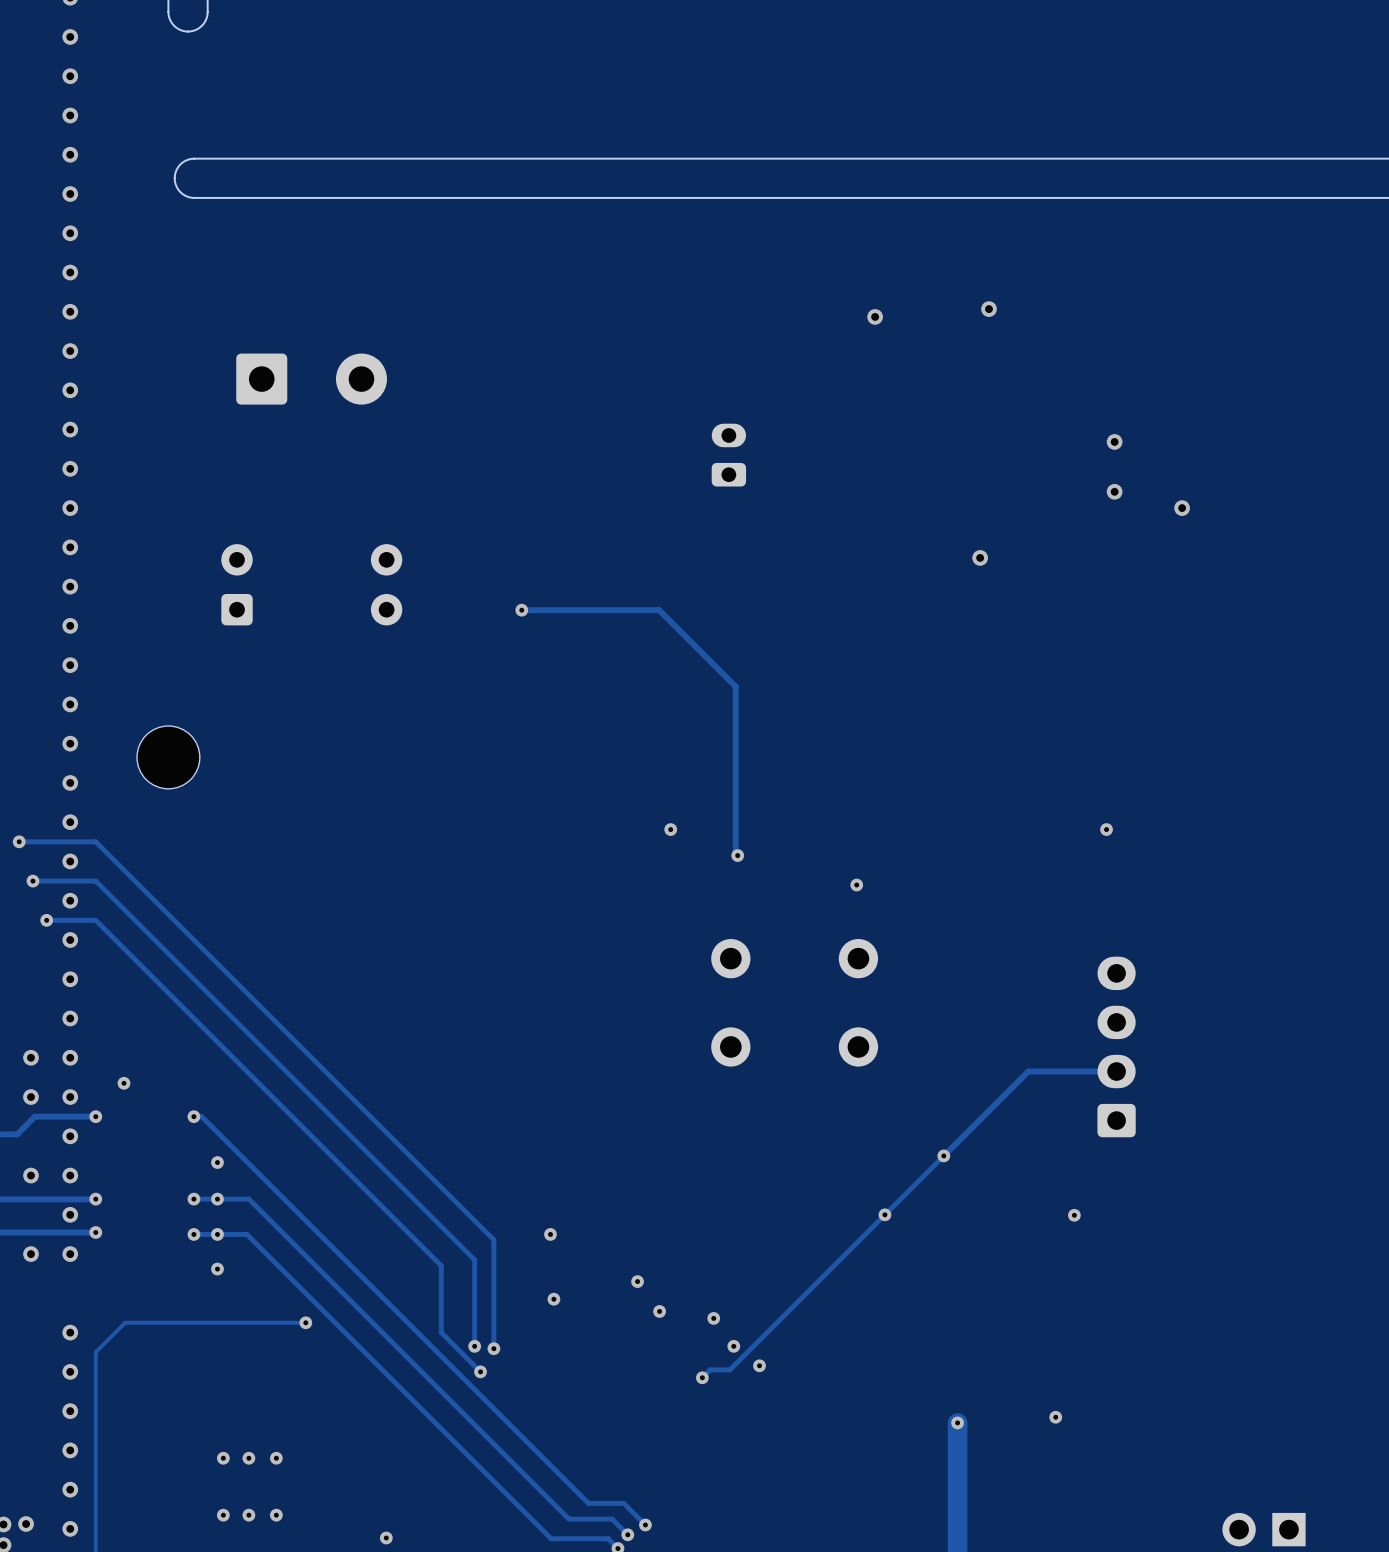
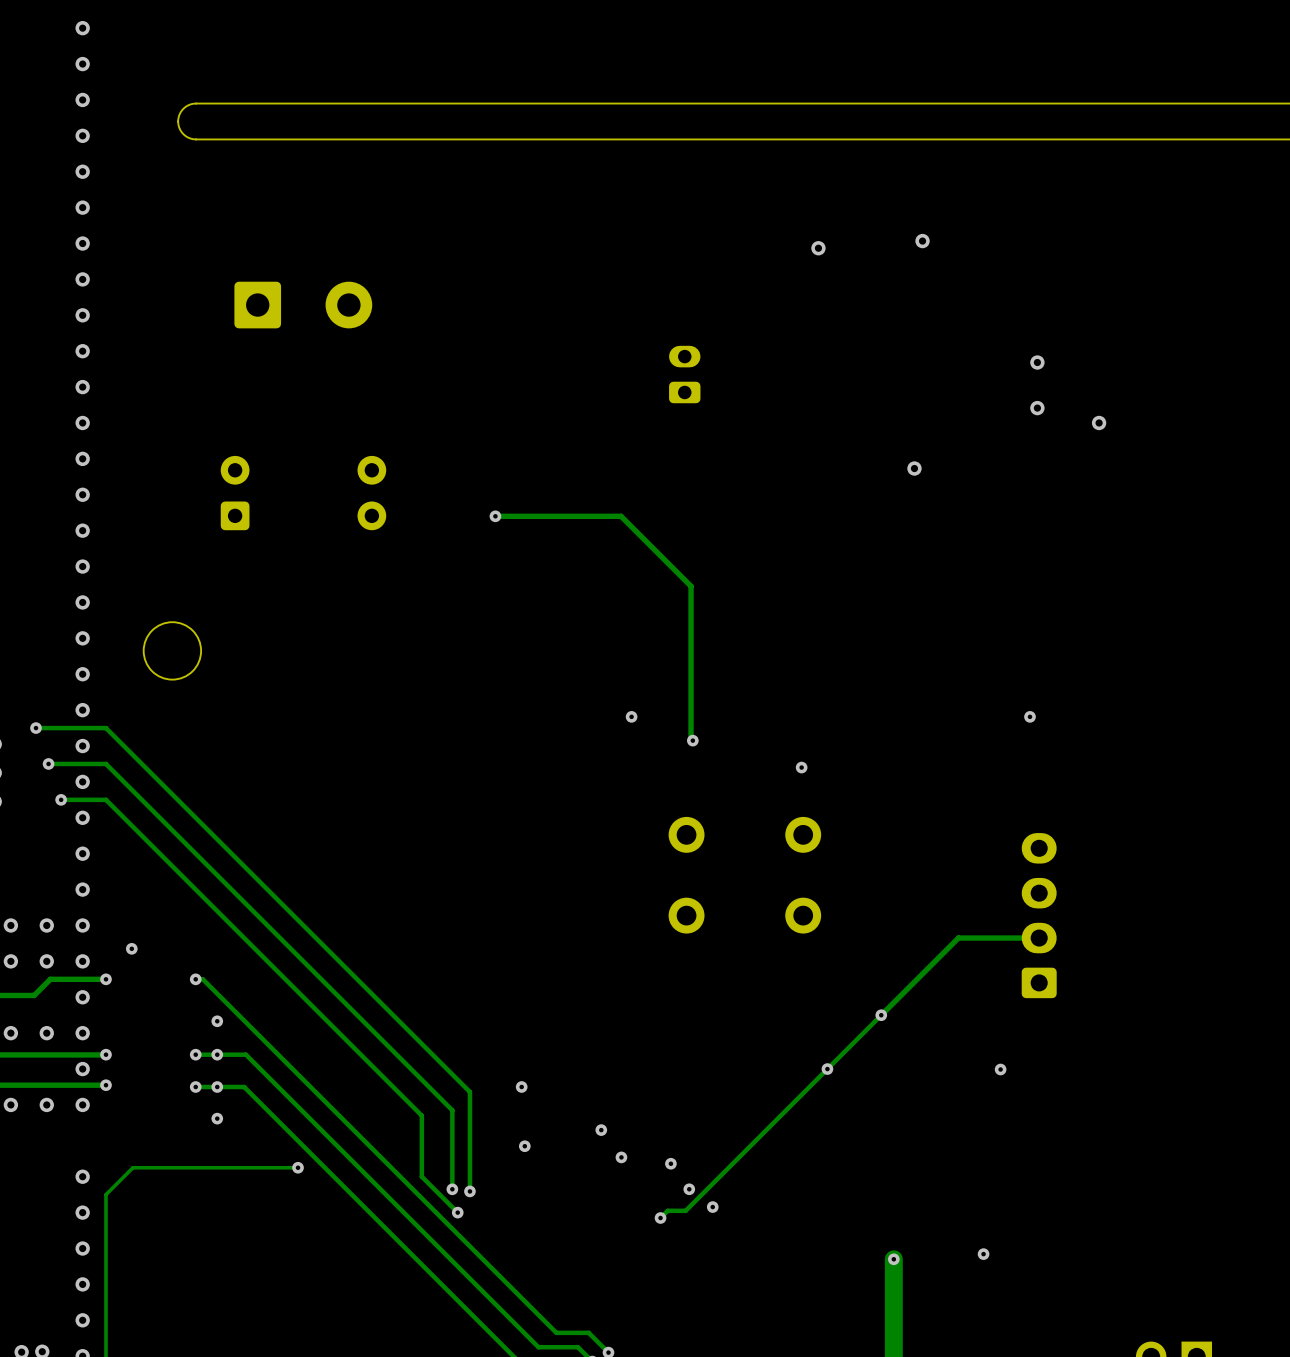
via: (223, 1458) -> none
via: (248, 1458) -> none
via: (276, 1458) -> none
via: (223, 1515) -> none
via: (248, 1515) -> none
via: (276, 1515) -> none

